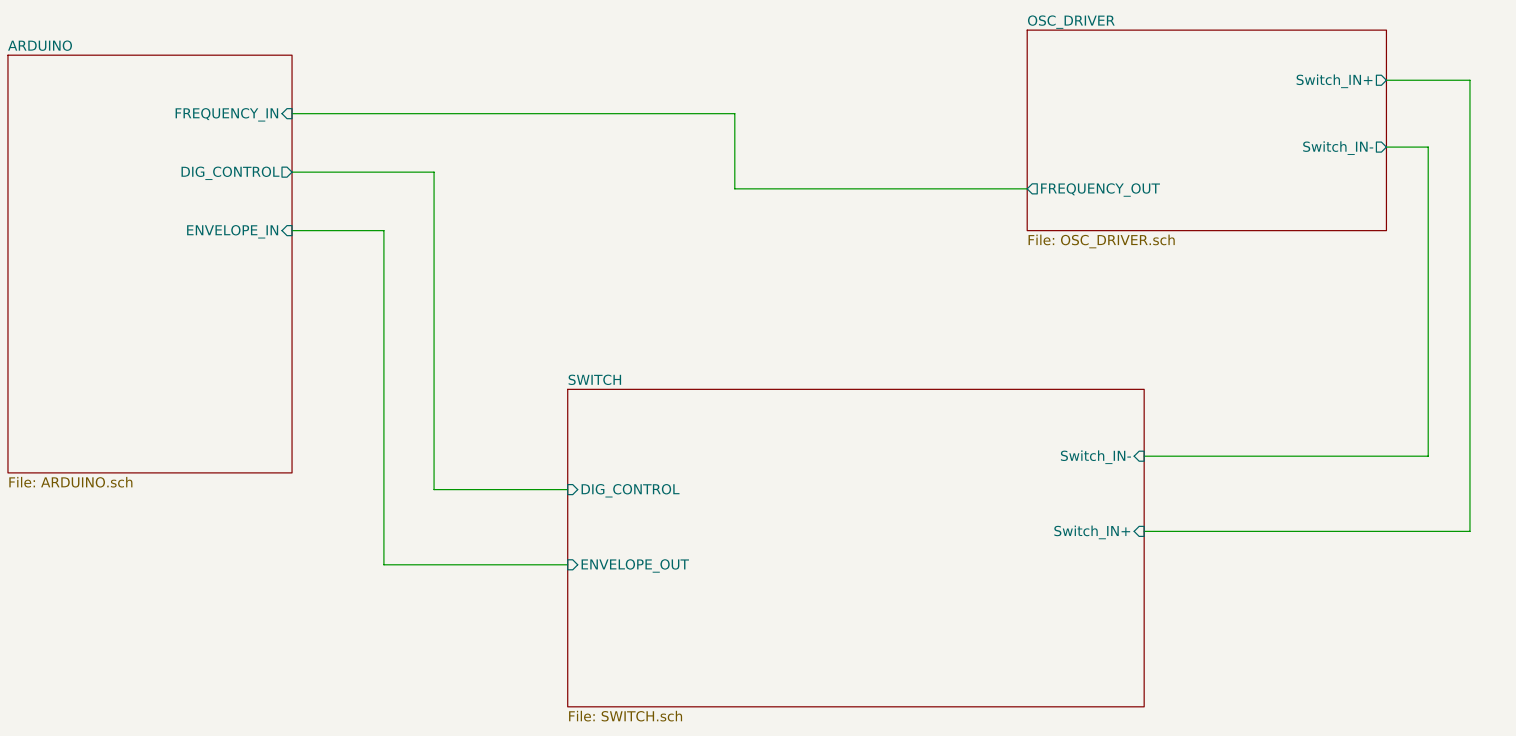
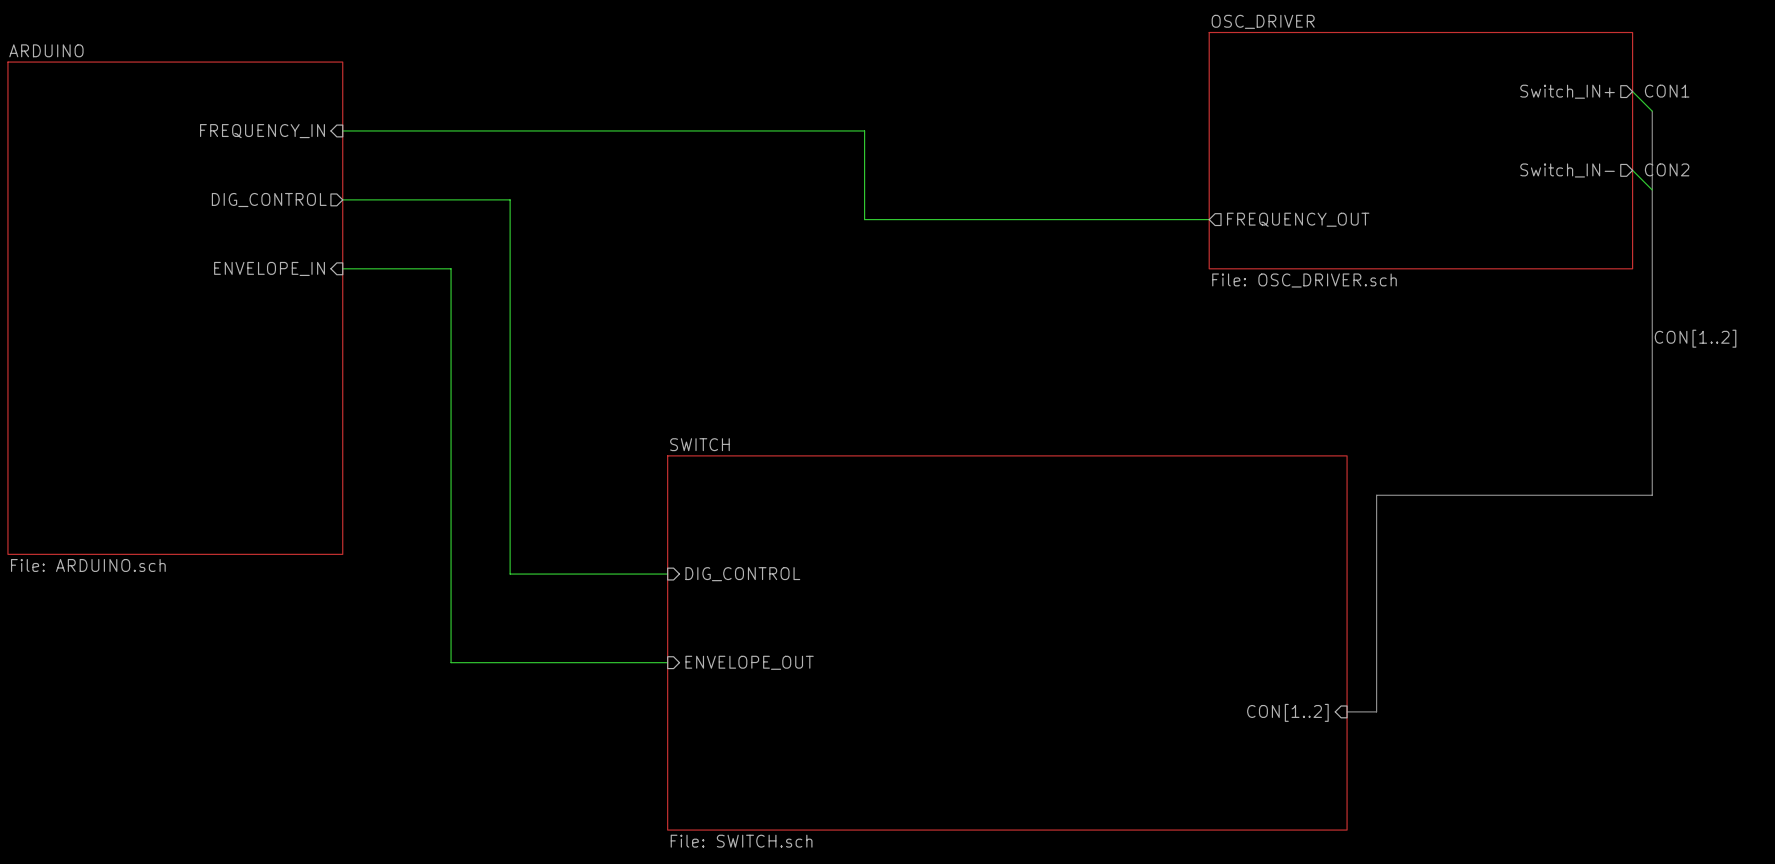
label: none -> CON1 (1667, 91)
wire: (1386, 80) (1469, 80) (1469, 531) (1144, 531) -> (1632, 91) (1652, 111)
bus: none -> (1652, 111) (1652, 495) (1376, 495) (1376, 711) (1347, 711)
label: none -> CON2 (1667, 169)
wire: (1386, 147) (1428, 147) (1428, 456) (1144, 456) -> (1632, 170) (1652, 190)
label: none -> CON[1..2] (1695, 338)
sheet pin: Switch_IN- (1095, 457) -> none
sheet pin: Switch_IN+ (1092, 532) -> none
sheet pin: none -> CON[1..2] (1287, 712)

